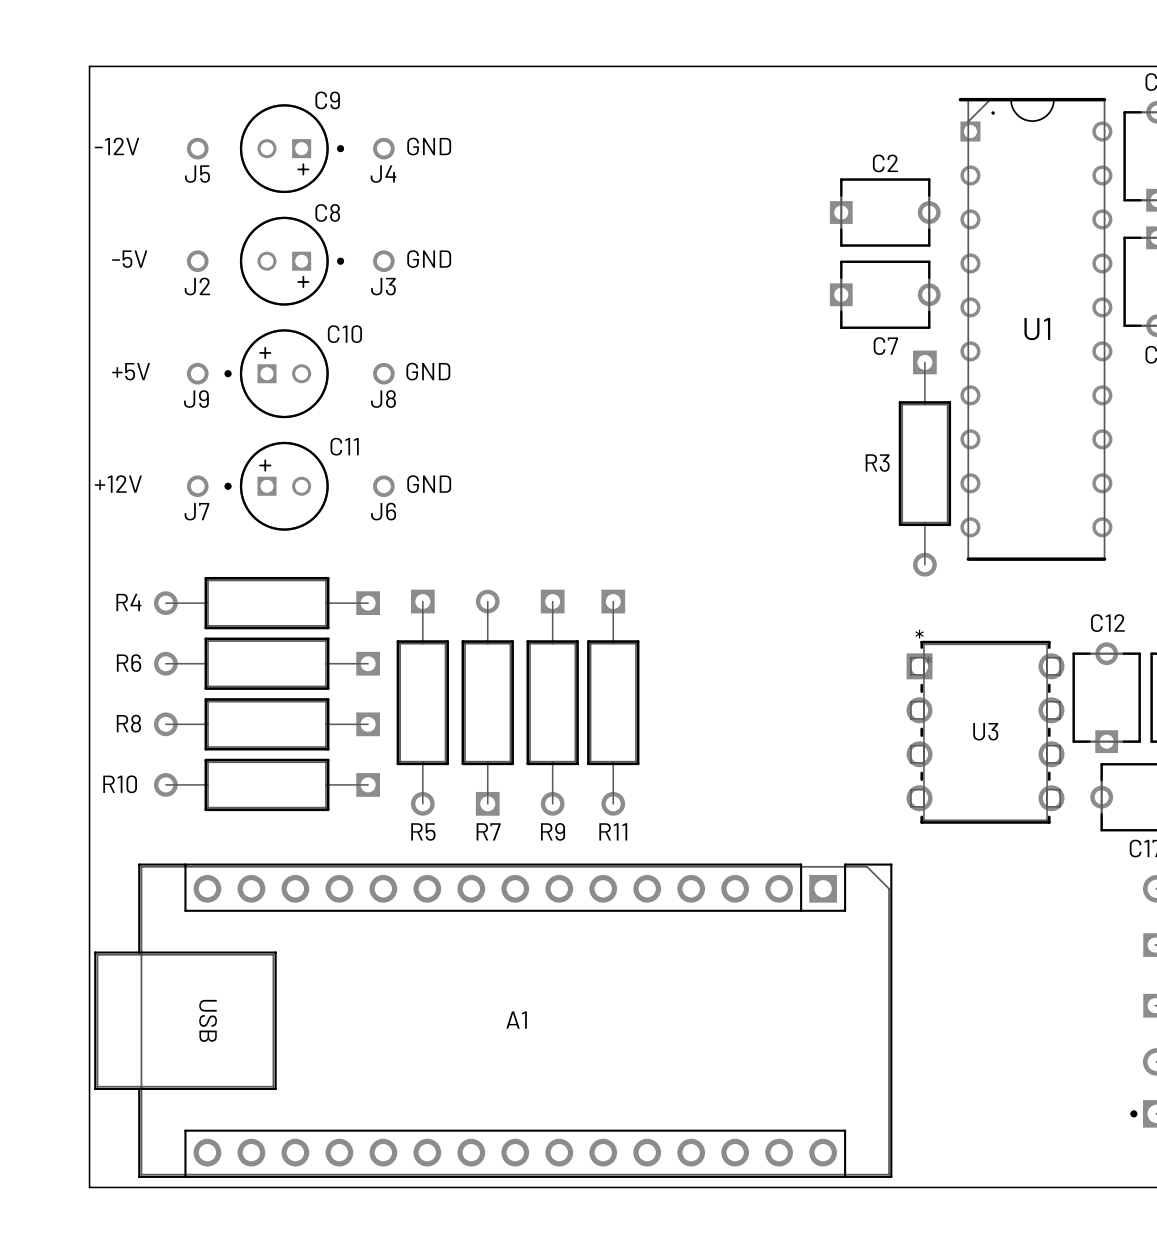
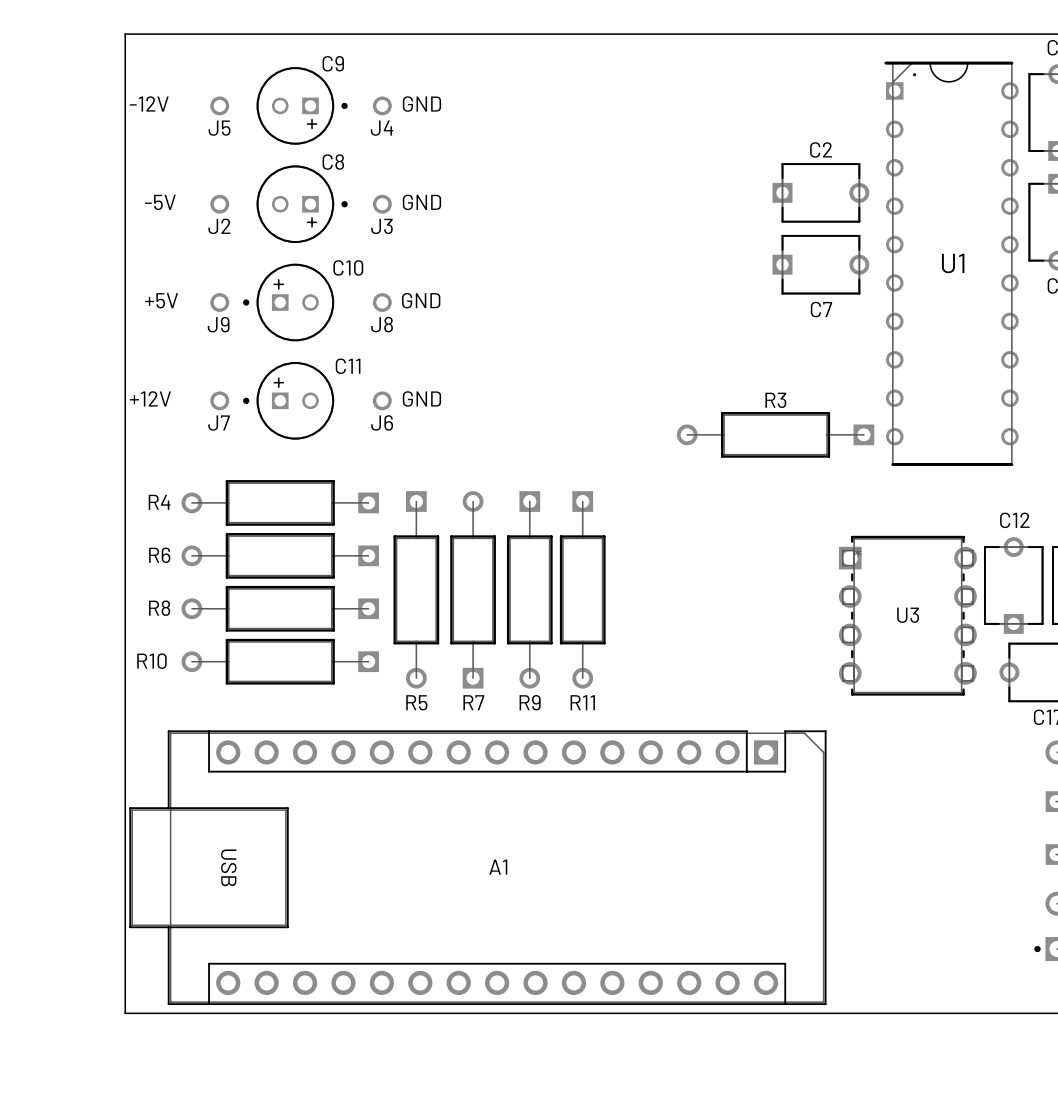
C2 position: (885, 212) -> (820, 192)
C7 position: (885, 294) -> (820, 264)
R3 rotation: 0° (924, 463) -> 90° clockwise (775, 434)
U3 text: * (919, 634) -> none

